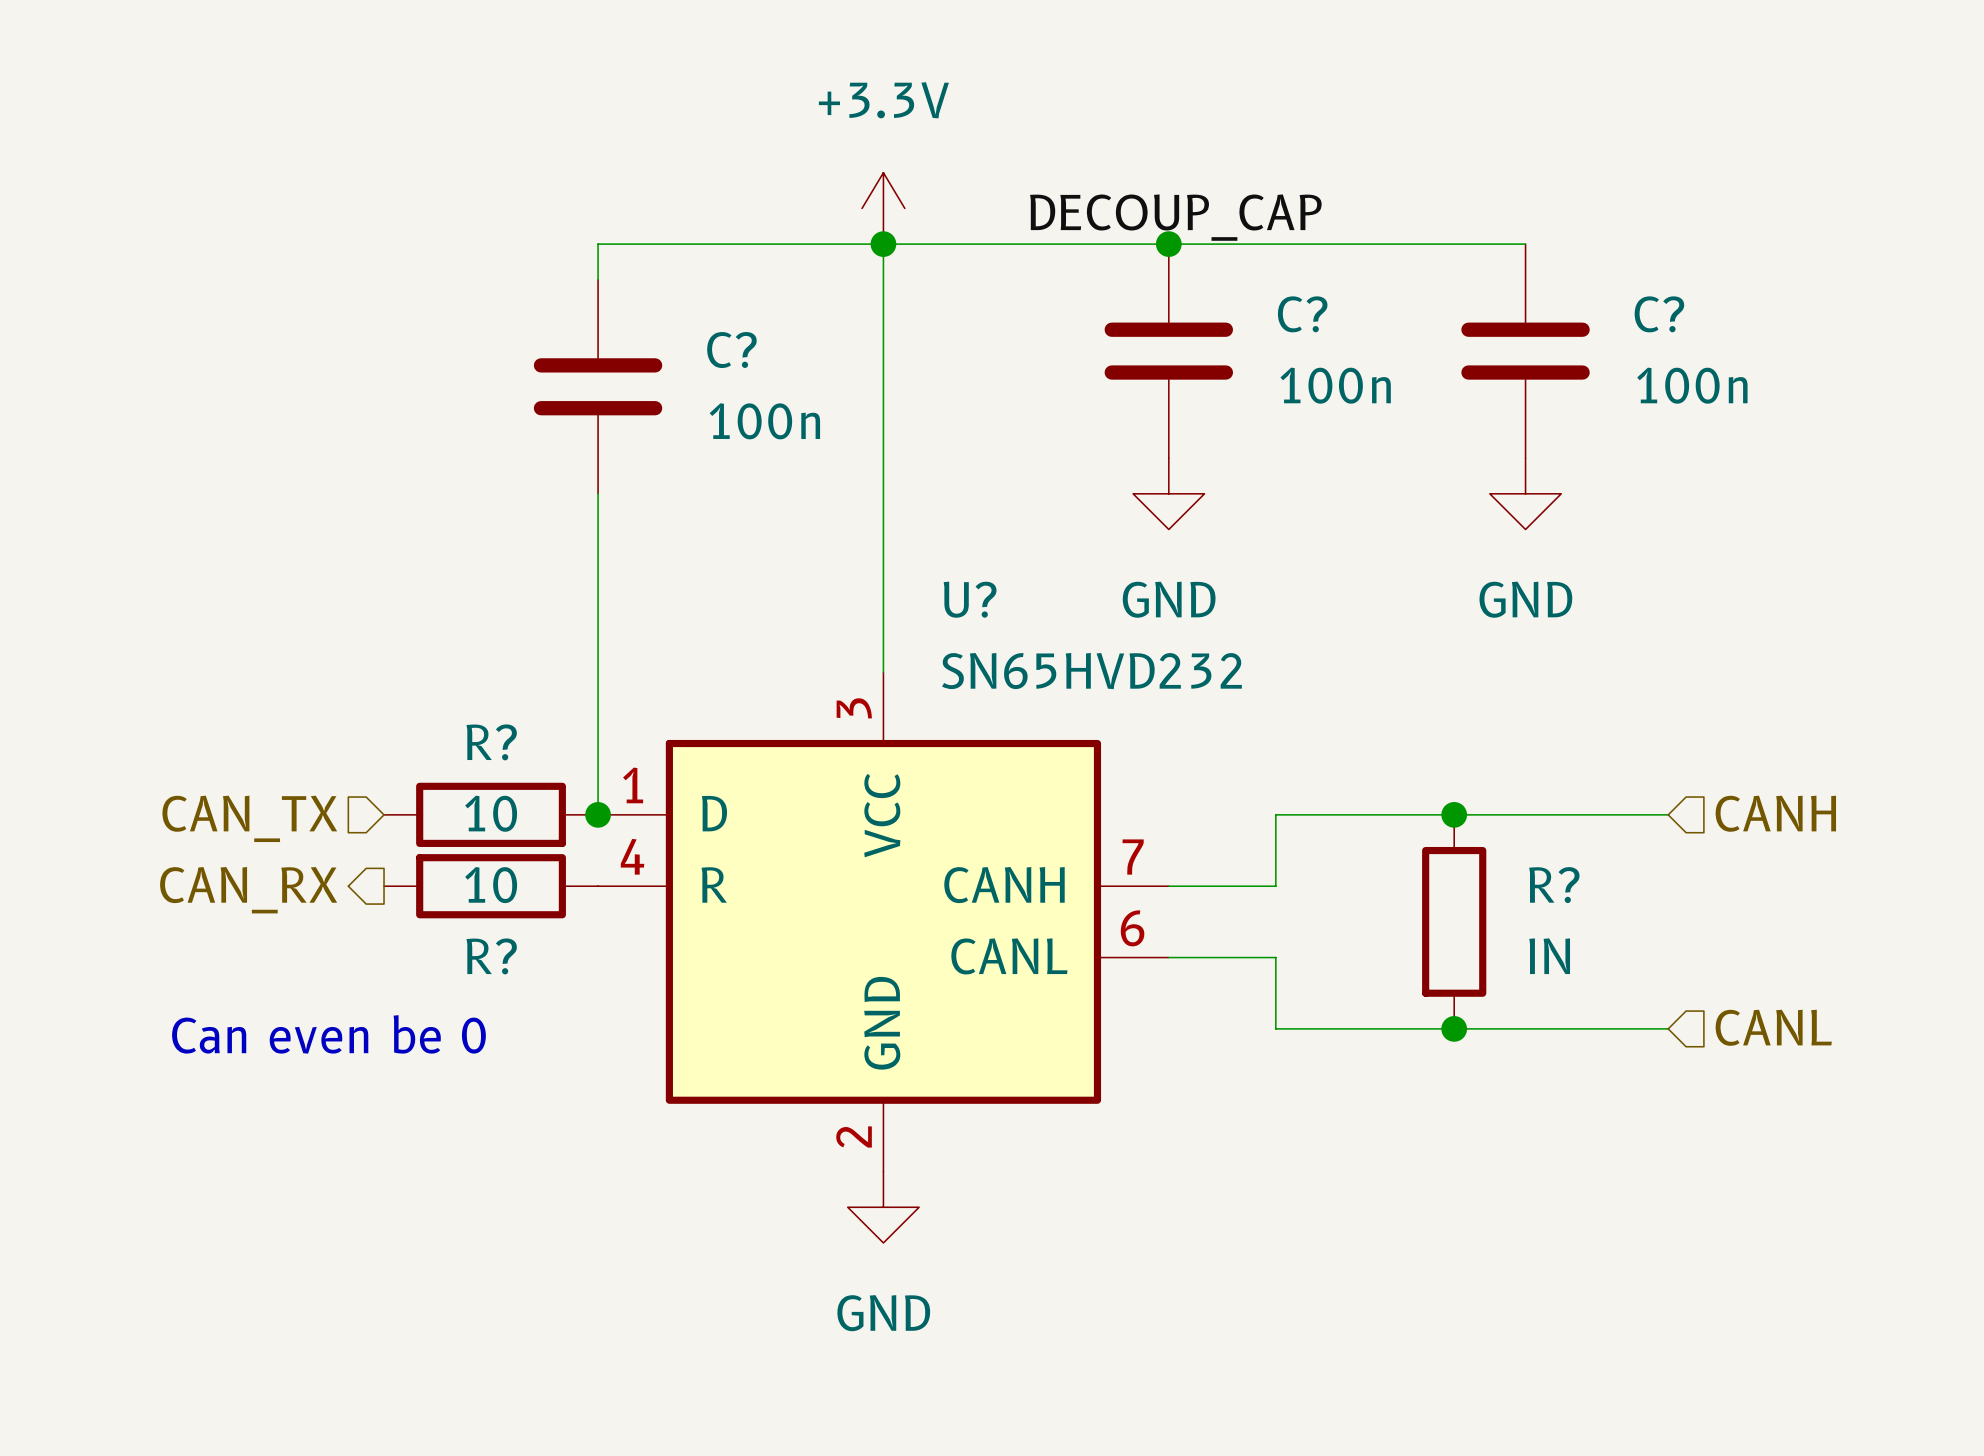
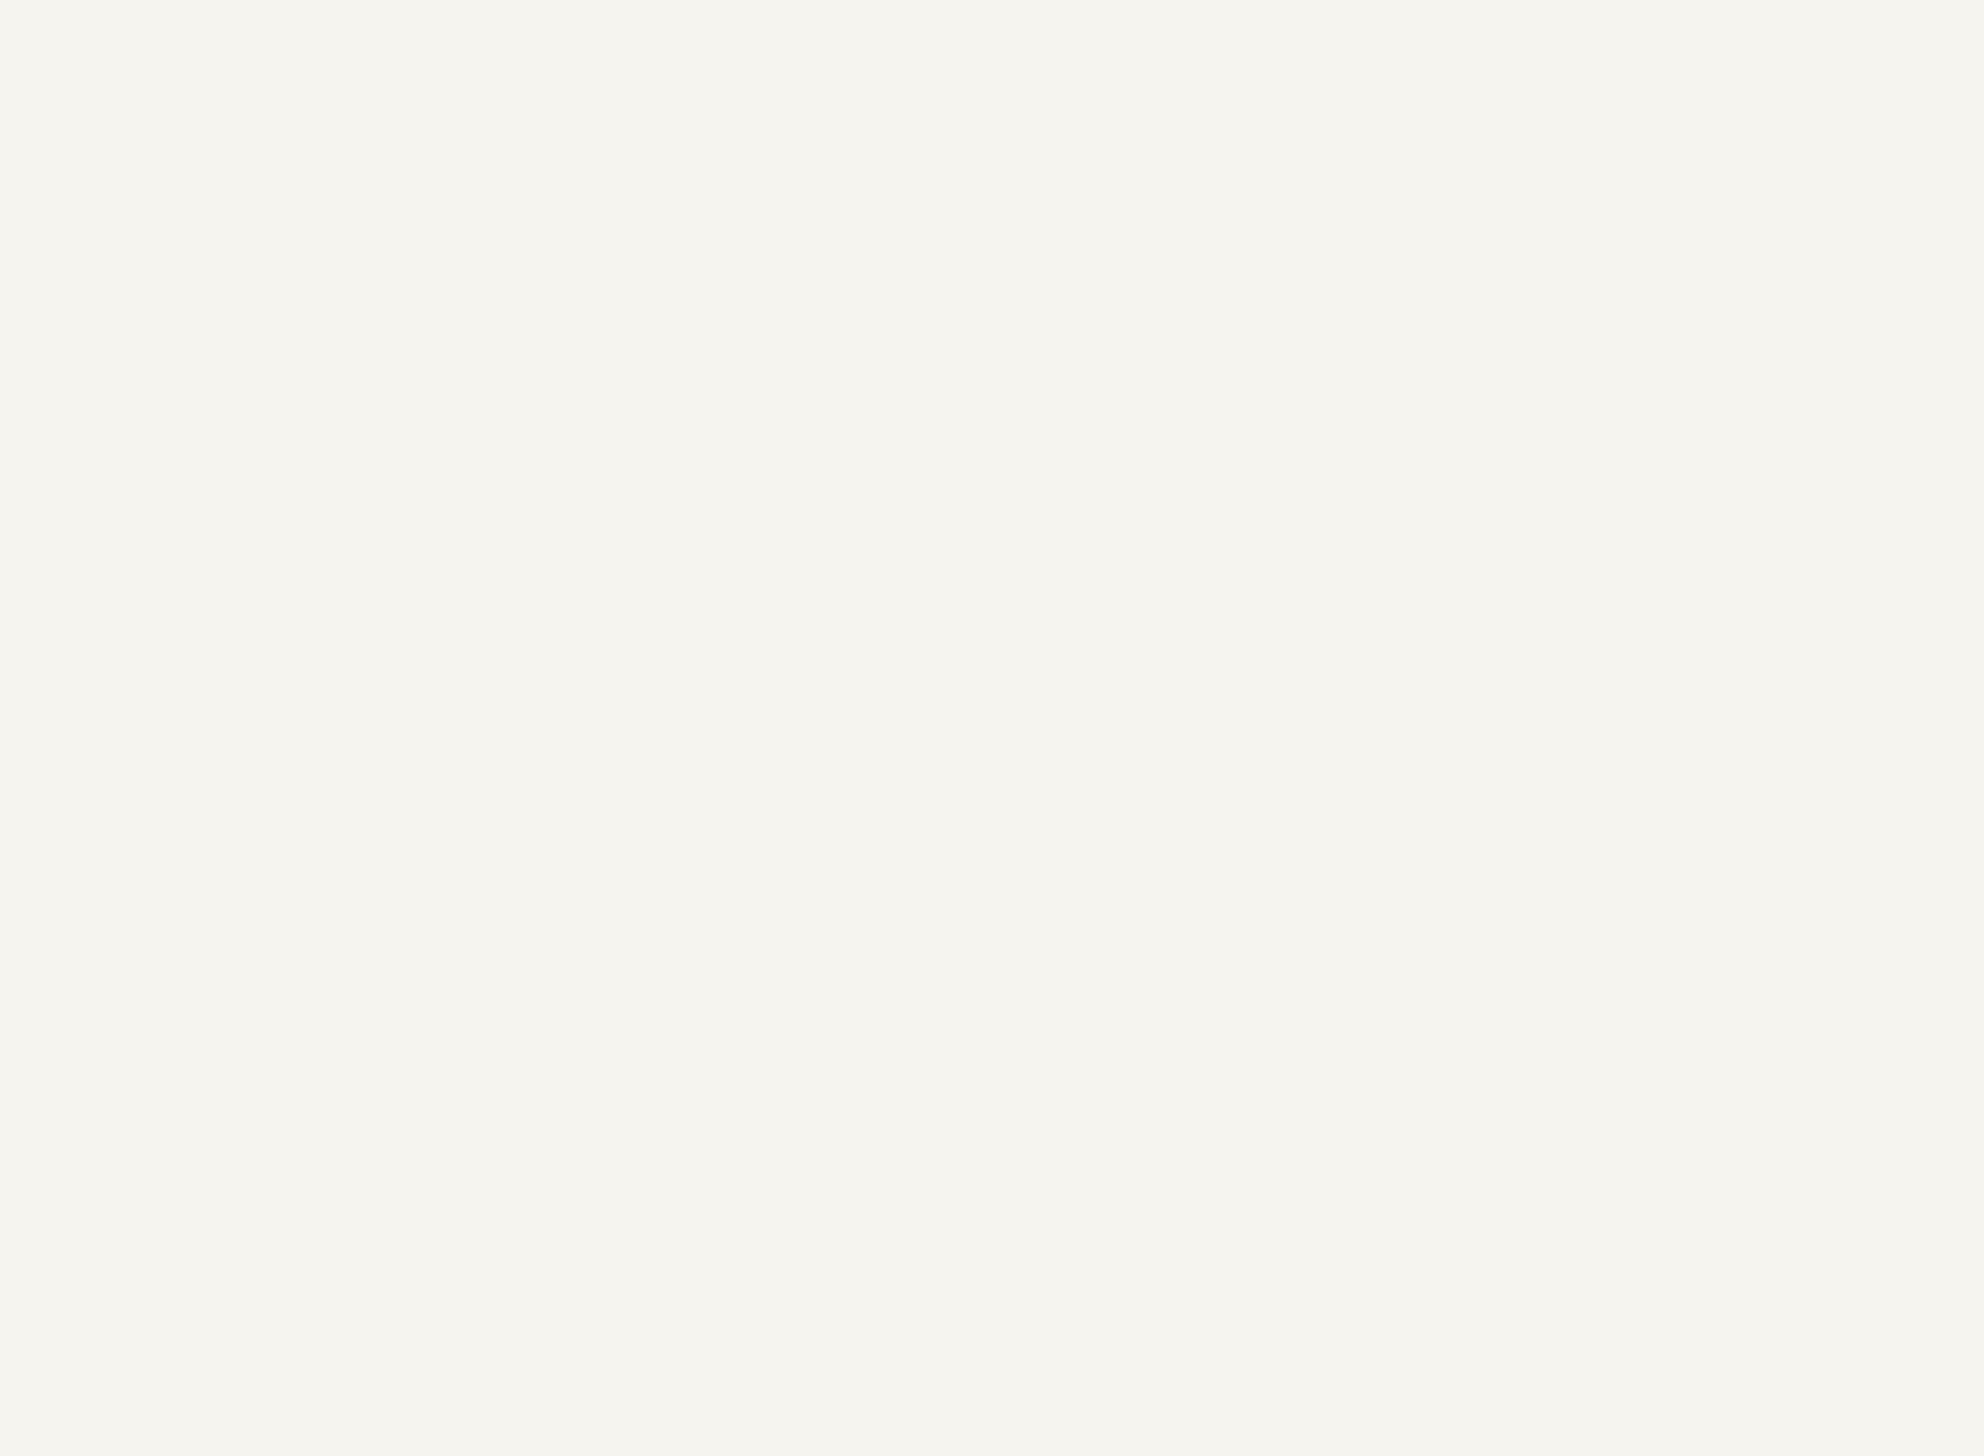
power symbol: +3.3V (883, 208) -> none
label: DECOUP_CAP (1175, 217) -> none
wire: (883, 244) (883, 672) -> none
junction: (883, 244) -> none
junction: (1168, 244) -> none
wire: (1525, 244) (598, 244) (598, 279) -> none
C?: 100n (1168, 351) -> none
C?: 100n (1525, 351) -> none
C?: 100n (598, 386) -> none
wire: (598, 493) (598, 814) -> none
power symbol: GND (1168, 493) -> none
power symbol: GND (1525, 493) -> none
hierarchical label: CANH (1775, 813) -> none
R?: 10 (491, 814) -> none
junction: (598, 814) -> none
junction: (1454, 814) -> none
wire: (1668, 814) (1275, 814) (1275, 886) (1168, 886) -> none
hierarchical label: CAN_TX (249, 818) -> none
R?: 10 (491, 886) -> none
hierarchical label: CAN_RX (248, 890) -> none
U?: SN65HVD232 (883, 921) -> none
R?: IN (1454, 921) -> none
wire: (1168, 957) (1275, 957) (1275, 1028) (1668, 1028) -> none
hierarchical label: CANL (1773, 1027) -> none
junction: (1454, 1028) -> none
text: Can even be 0 (328, 1034) -> none
power symbol: GND (883, 1207) -> none

